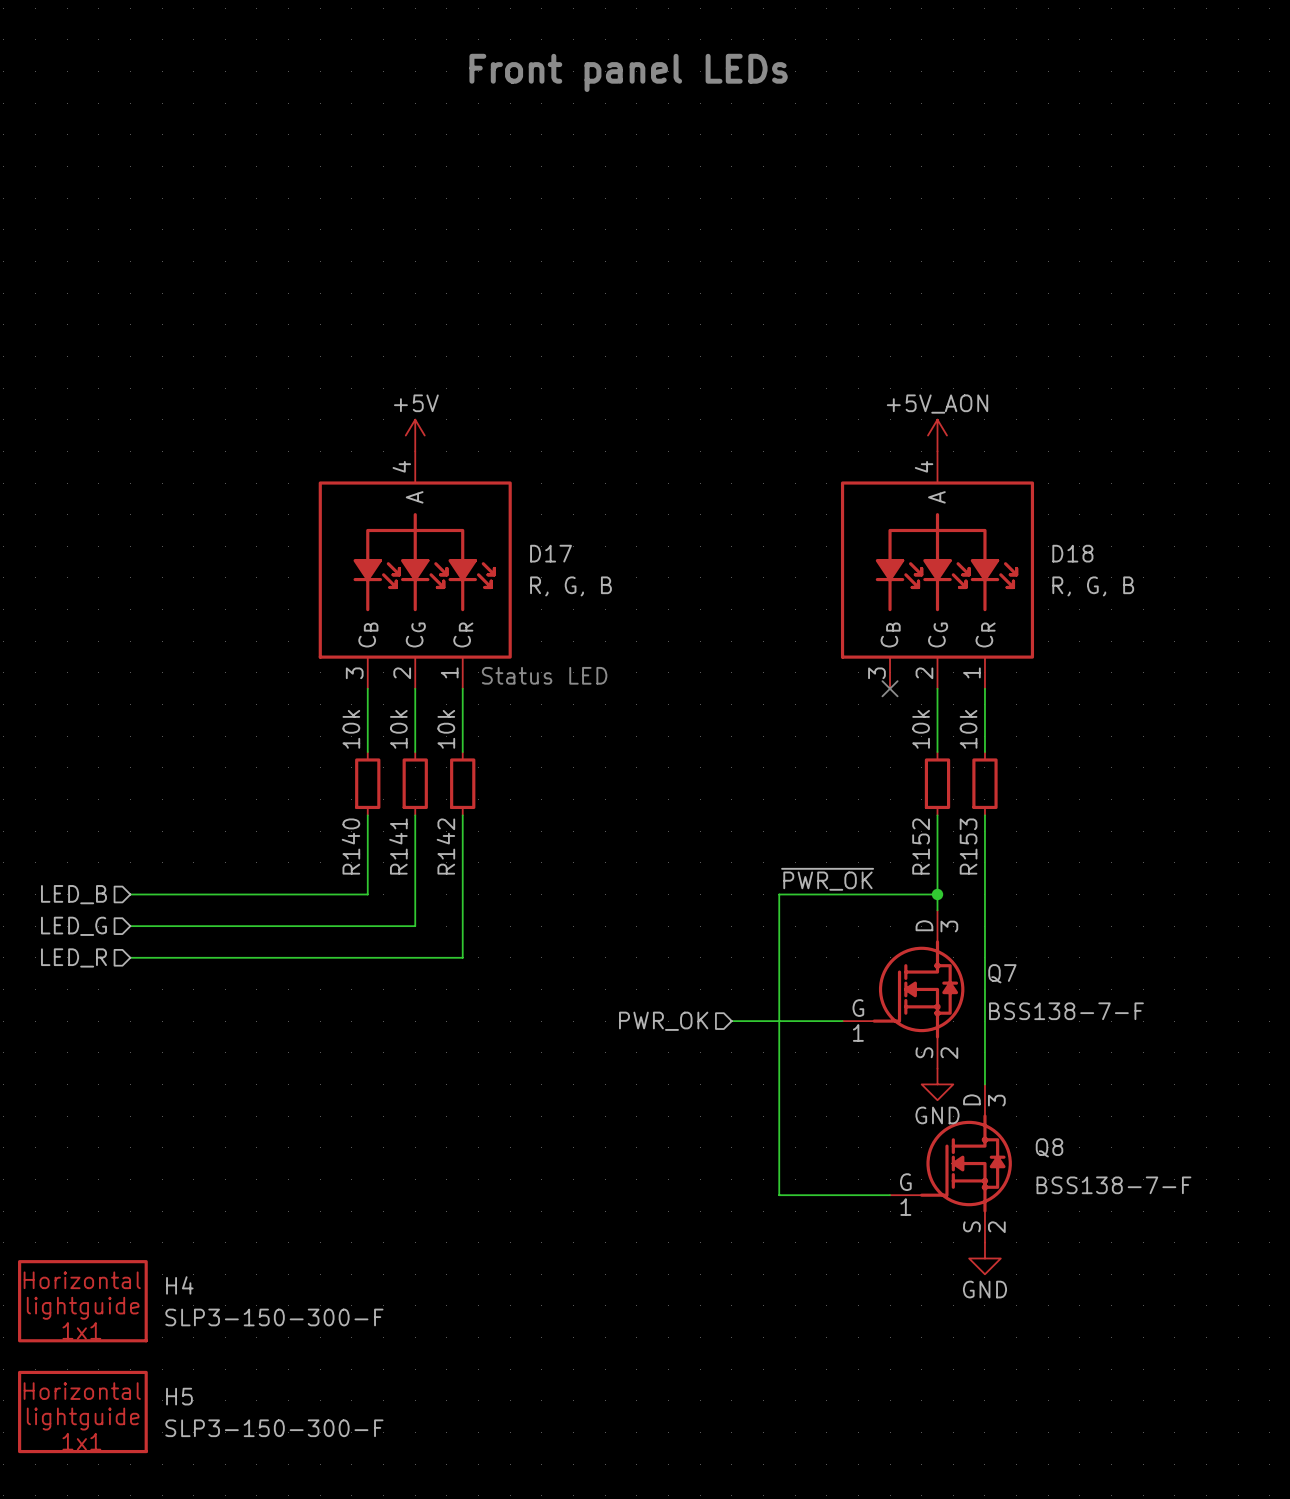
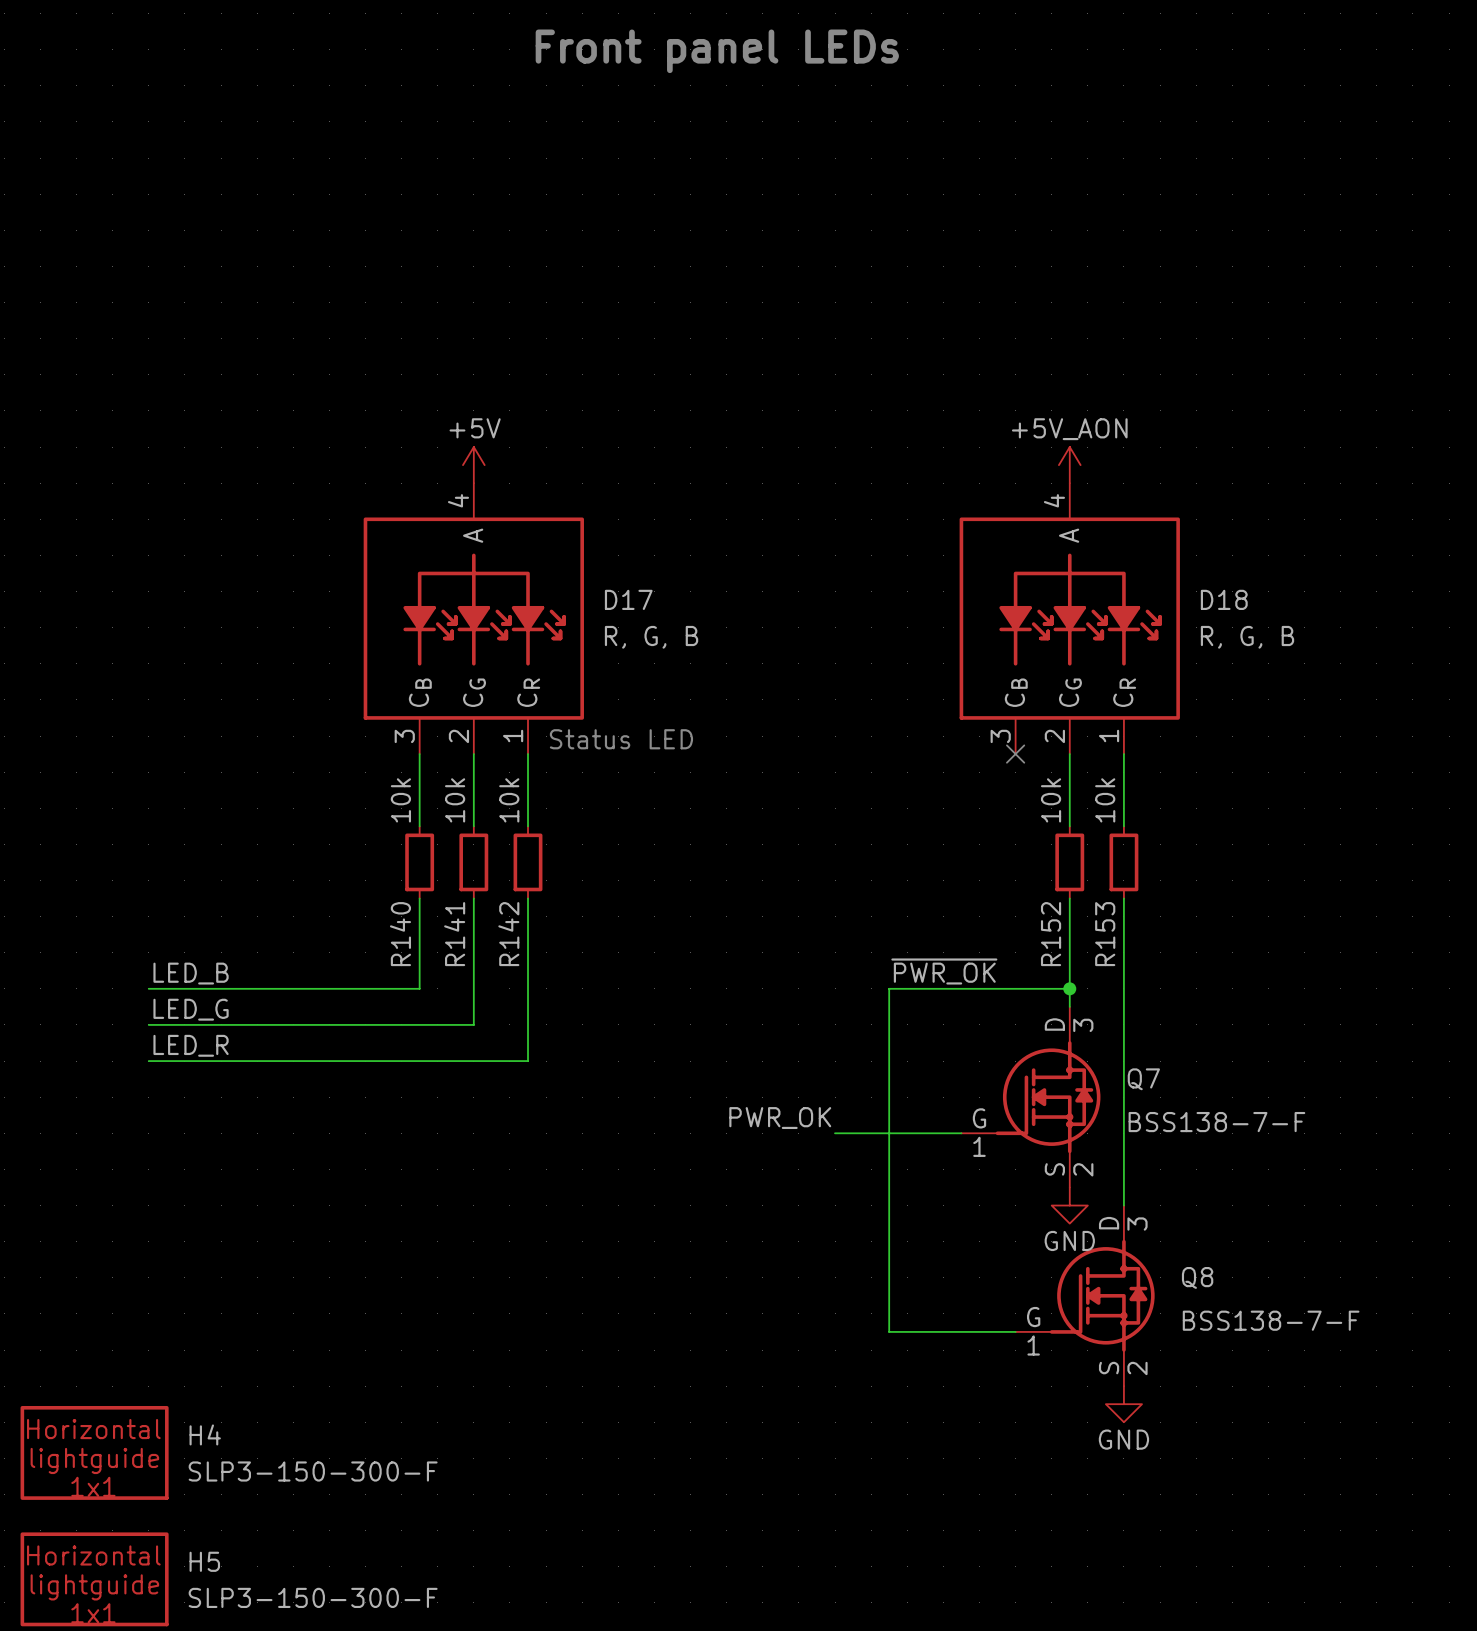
label: none -> LED_B (191, 973)
hierarchical label: LED_B (73, 894) -> none
label: none -> LED_G (191, 1009)
hierarchical label: LED_G (73, 926) -> none
label: none -> LED_R (191, 1045)
hierarchical label: LED_R (73, 957) -> none
label: none -> PWR_OK (780, 1118)
hierarchical label: PWR_OK (663, 1021) -> none

